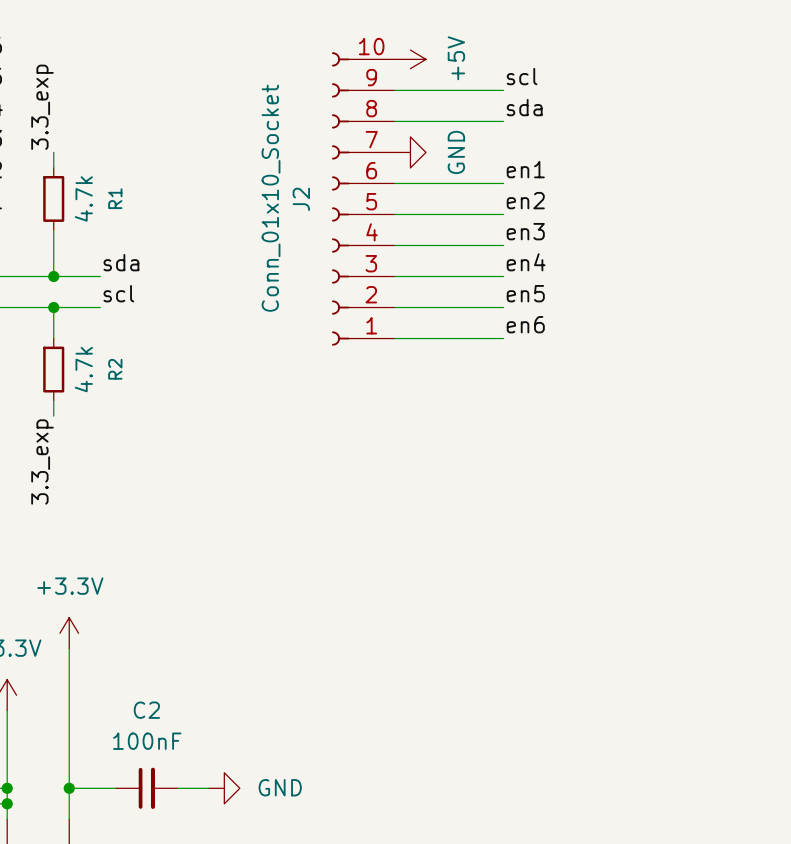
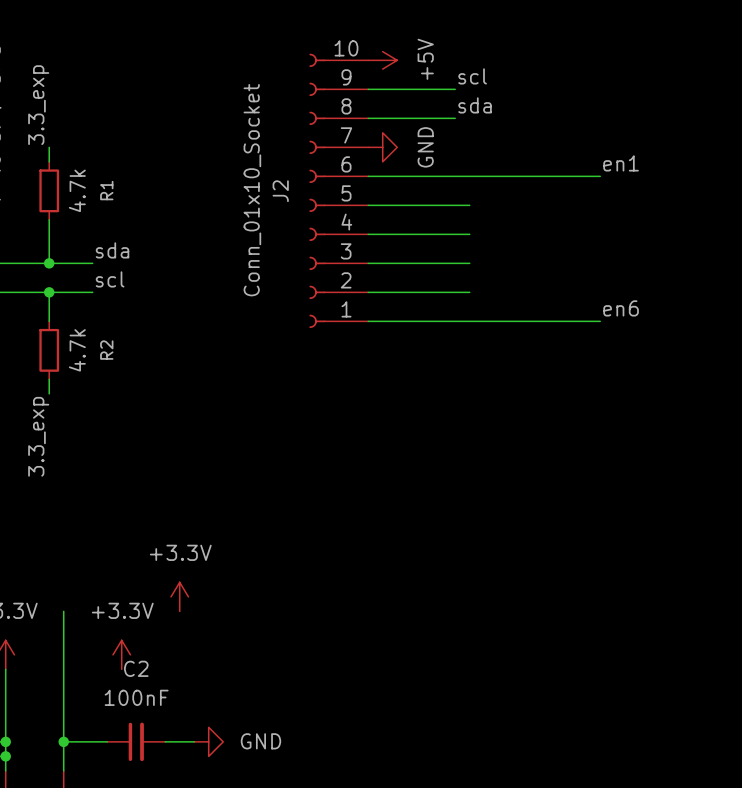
label position: scl (522, 76) -> scl (472, 76)
wire: (487, 90) (503, 90) -> none
label position: sda (524, 107) -> sda (475, 105)
wire: (487, 121) (503, 121) -> none
label position: en1 (525, 169) -> en1 (621, 163)
wire: none -> (469, 176) (600, 176)
label: en2 (525, 200) -> none
label: en3 (525, 231) -> none
label: en4 (526, 262) -> none
label: en5 (525, 293) -> none
label position: en6 (525, 324) -> en6 (621, 308)
wire: none -> (469, 321) (600, 321)
power symbol: +3.3V (69, 633) -> none
power symbol: none -> +3.3V (179, 596)
power symbol: none -> +3.3V (121, 654)

